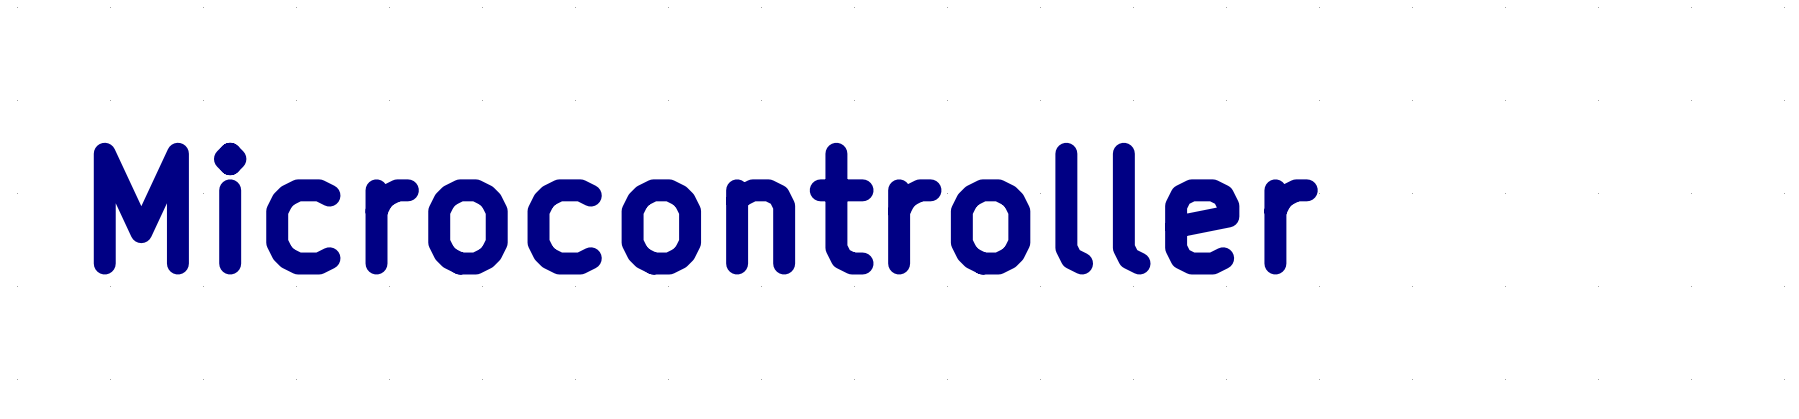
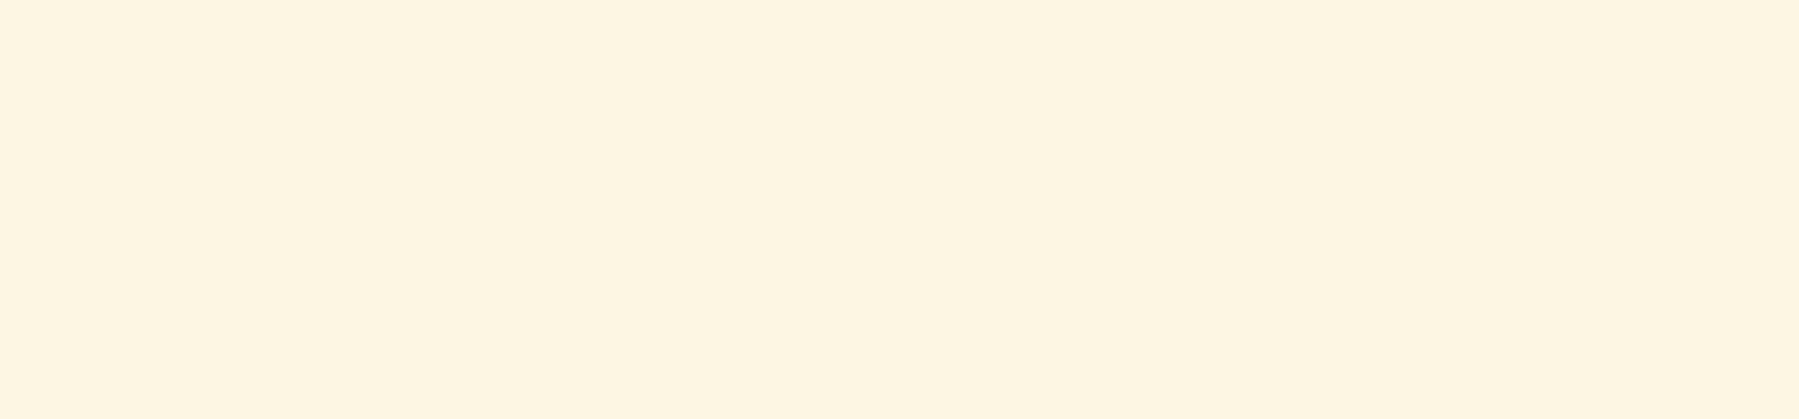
text: Microcontroller (705, 208) -> none

